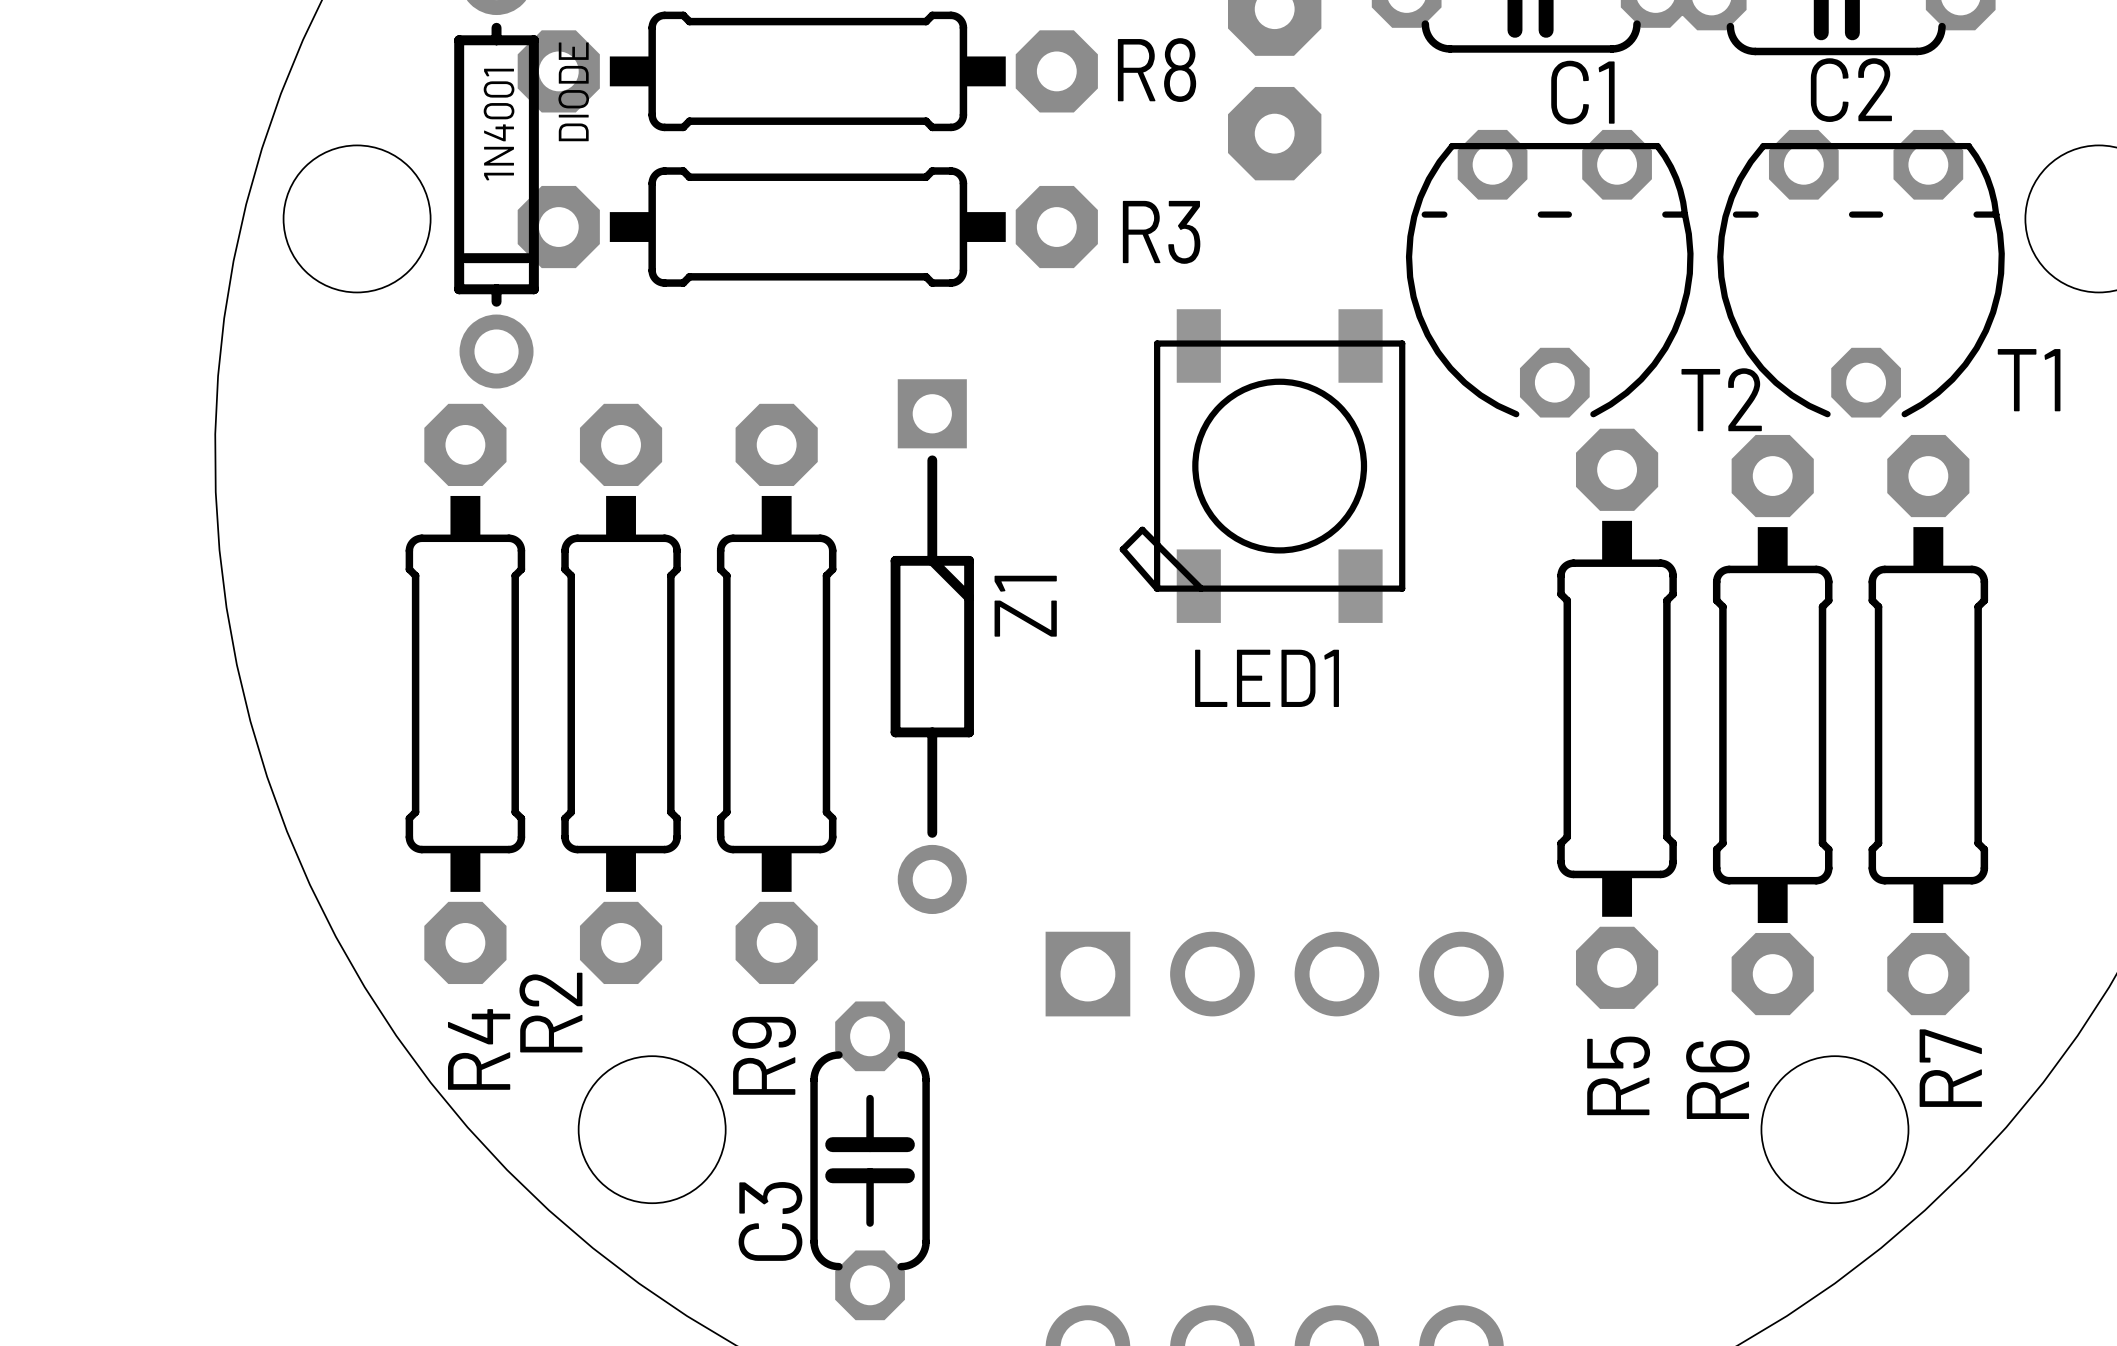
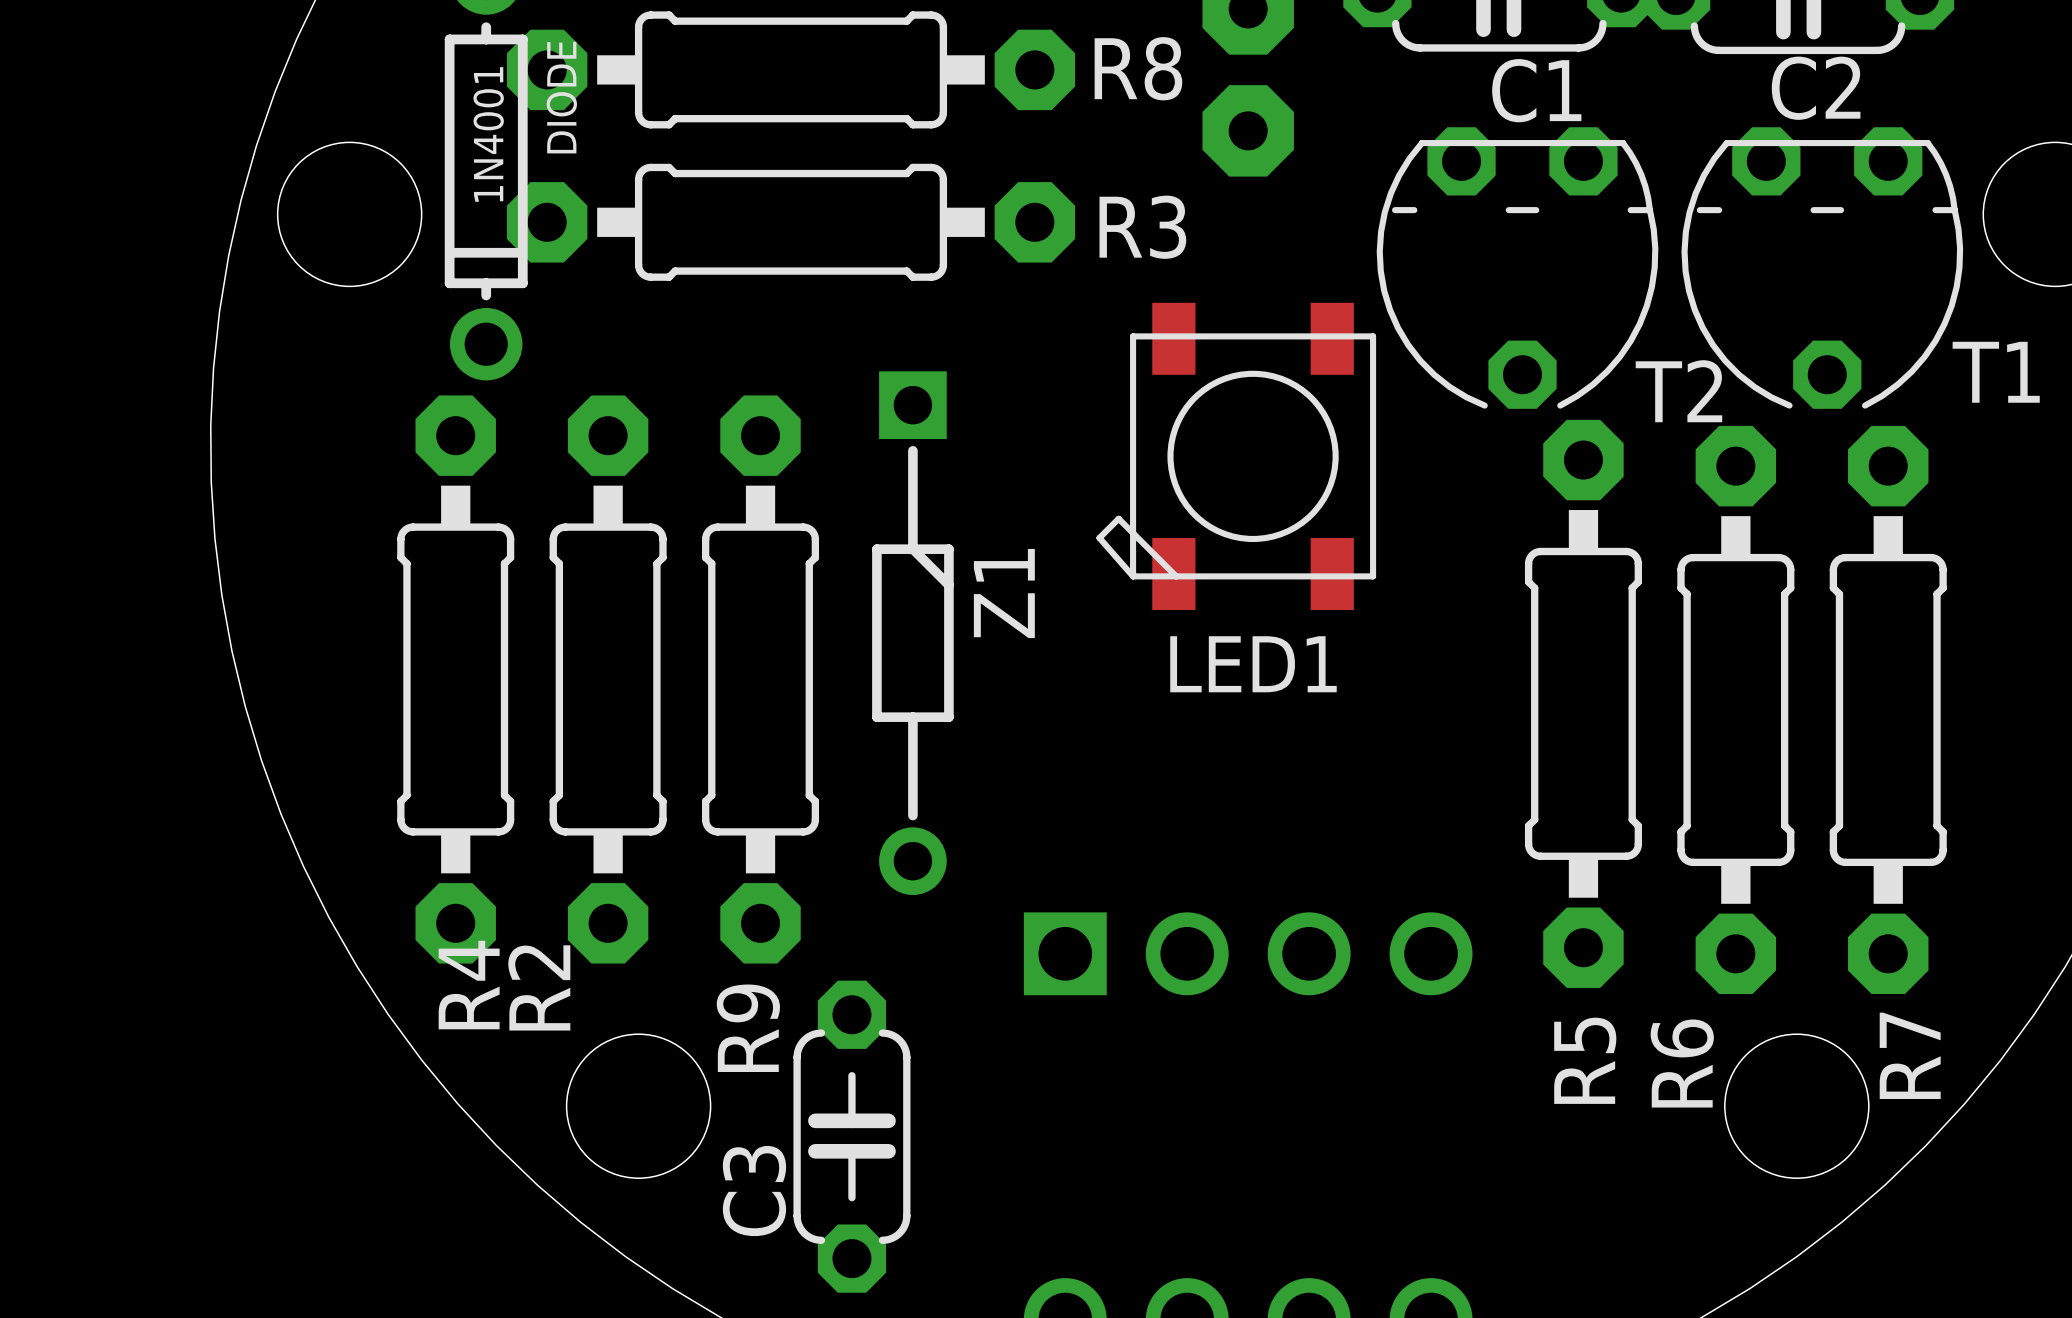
R4 name position: R4 (479, 1049) -> R4 (469, 985)

